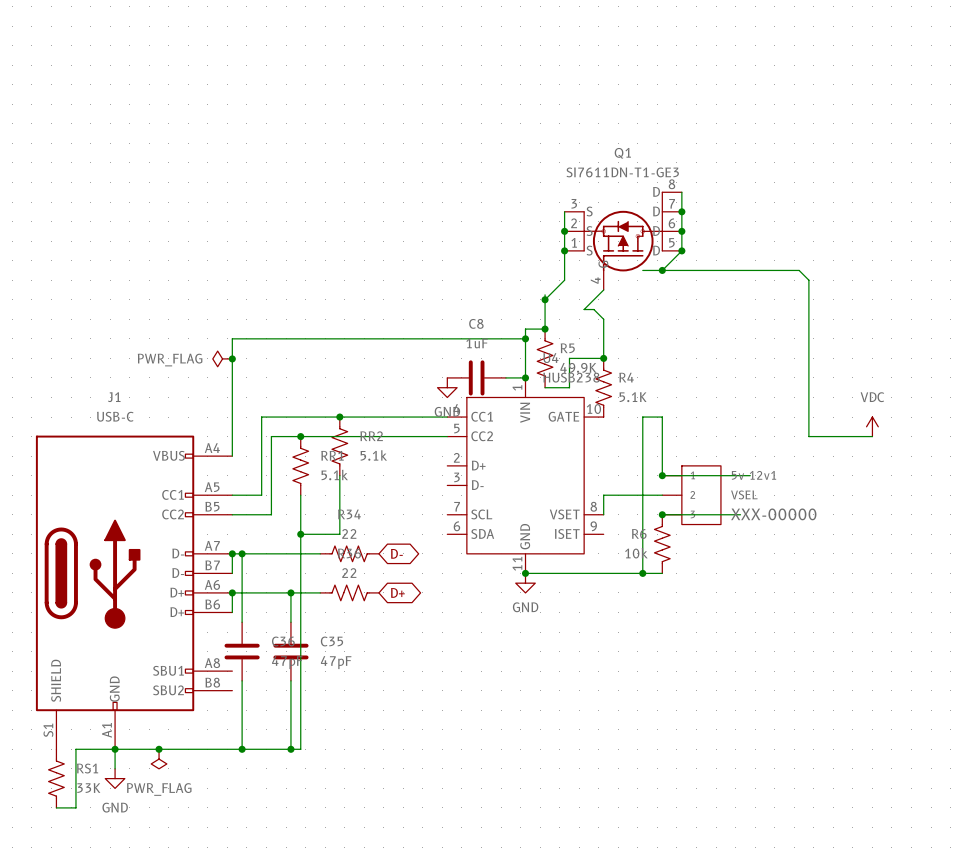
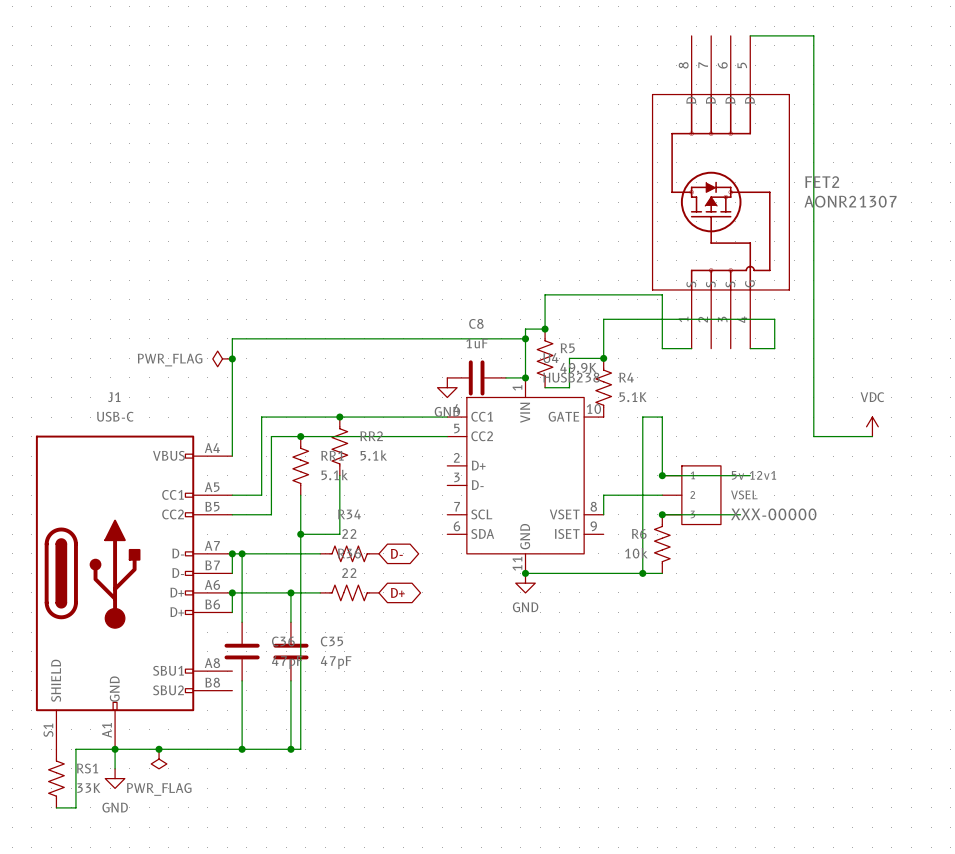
wire: (681, 192) (681, 250) (662, 270) -> none
FET2: none -> AONR21307 (720, 192)
wire: (564, 211) (564, 280) (545, 299) -> none
junction: (681, 211) -> none
junction: (564, 231) -> none
junction: (681, 231) -> none
Q1: SI7611DN-T1-GE3 (623, 240) -> none
junction: (564, 250) -> none
junction: (681, 250) -> none
wire: (642, 270) (799, 270) (808, 280) (808, 436) (813, 436) -> (750, 35) (813, 35) (813, 436)
junction: (662, 270) -> none
wire: (603, 289) (584, 309) (593, 309) (603, 319) -> (750, 348) (774, 348) (774, 319) (603, 319)
wire: none -> (545, 294) (662, 294) (662, 348) (691, 348)
junction: (545, 299) -> none

